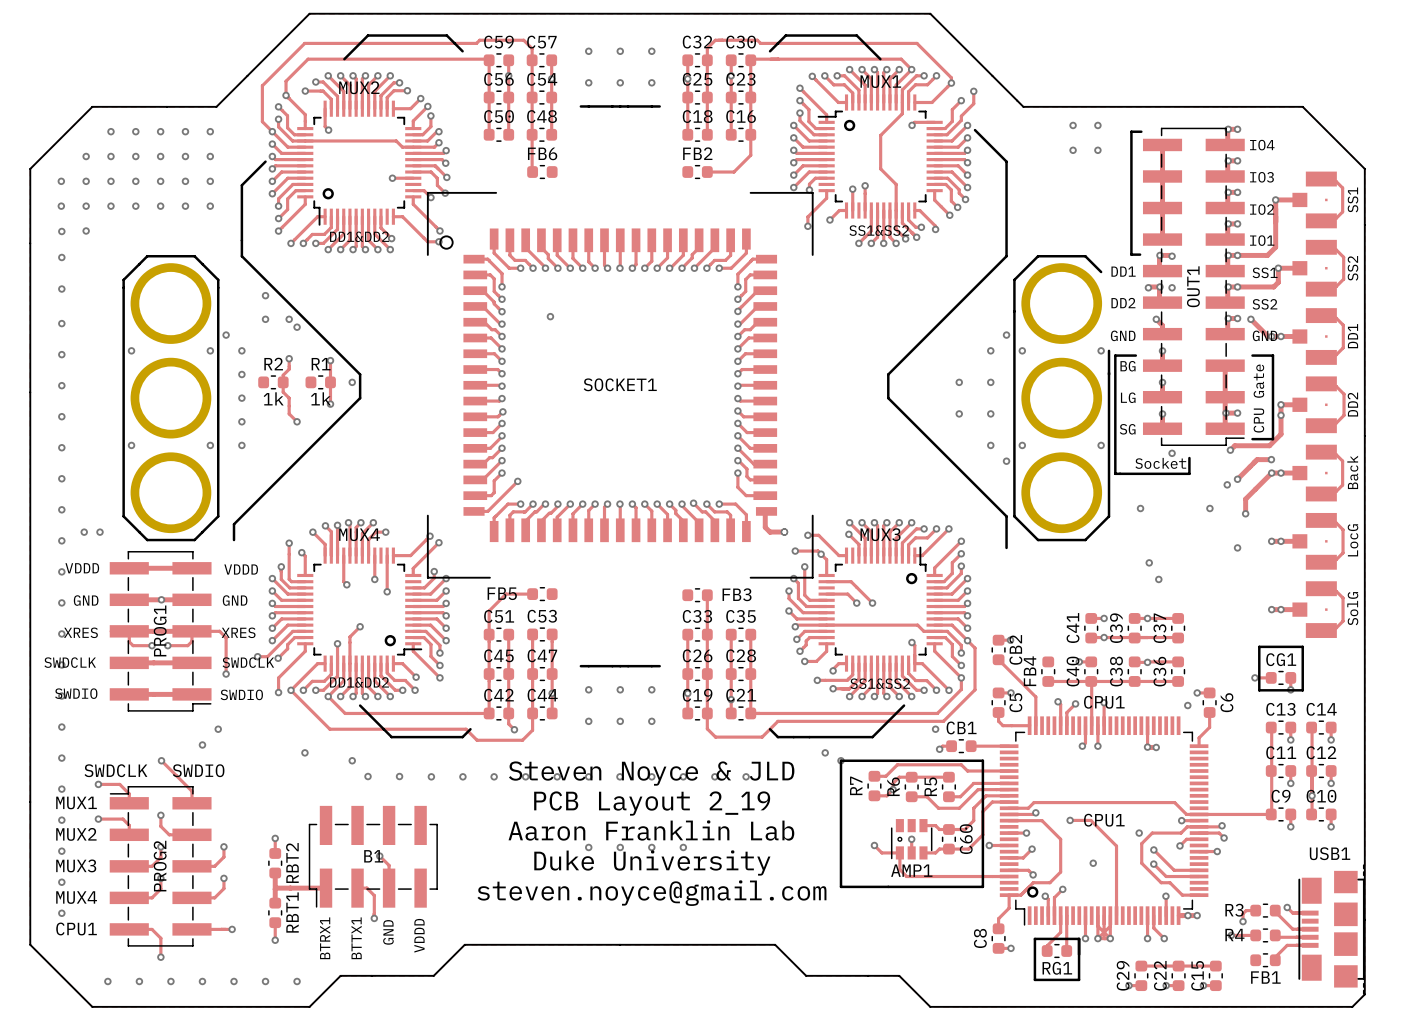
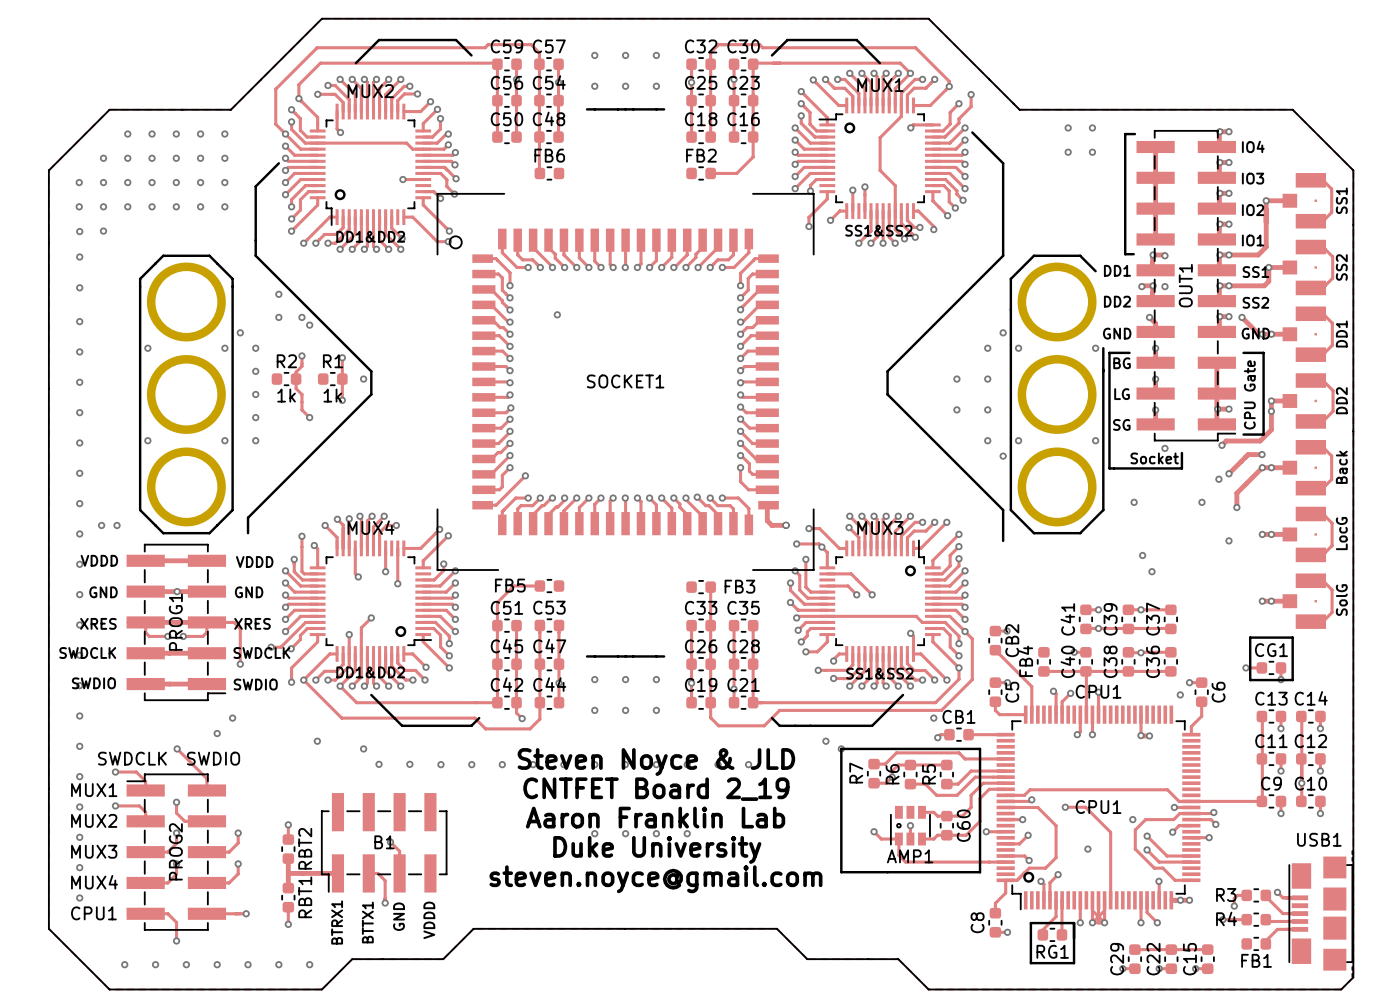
text: PCB Layout 2_19 (652, 803) -> CNTFET Board 2_19 (656, 789)

